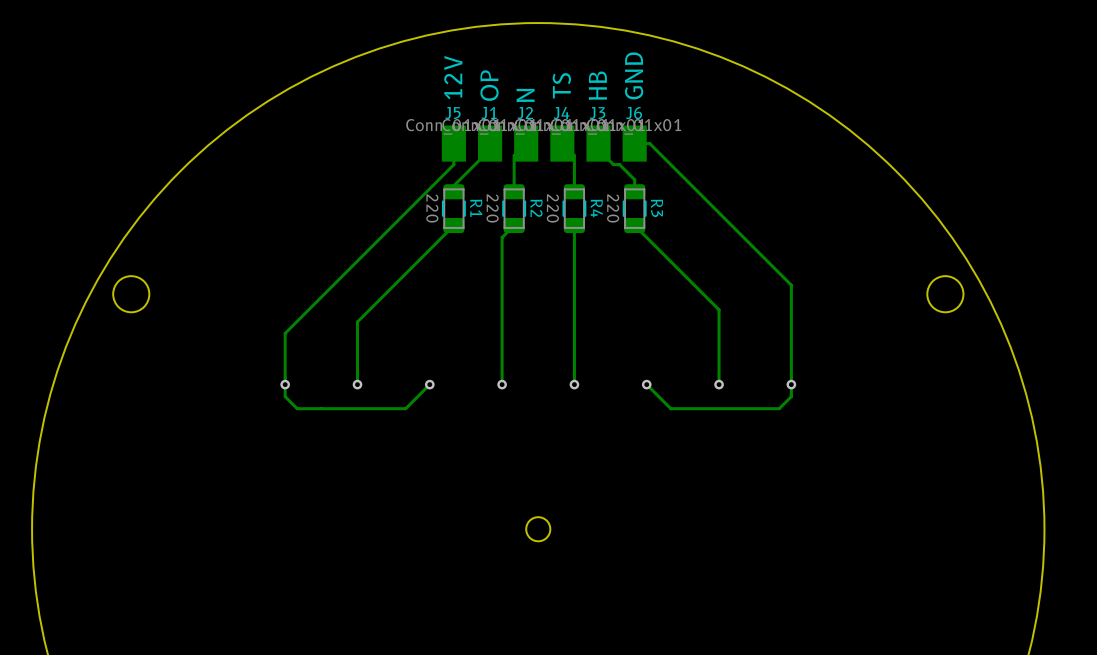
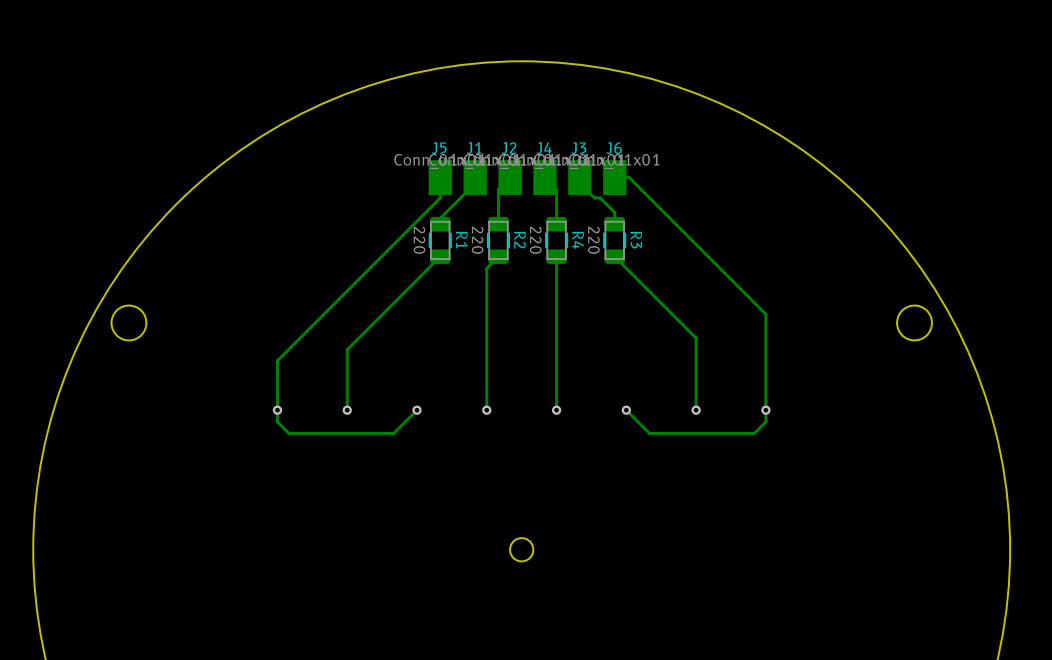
text: GND (634, 75) -> none
text: 12V (453, 77) -> none
text: OP (489, 85) -> none
text: TS (561, 85) -> none
text: HB (597, 85) -> none
text: N (525, 95) -> none

